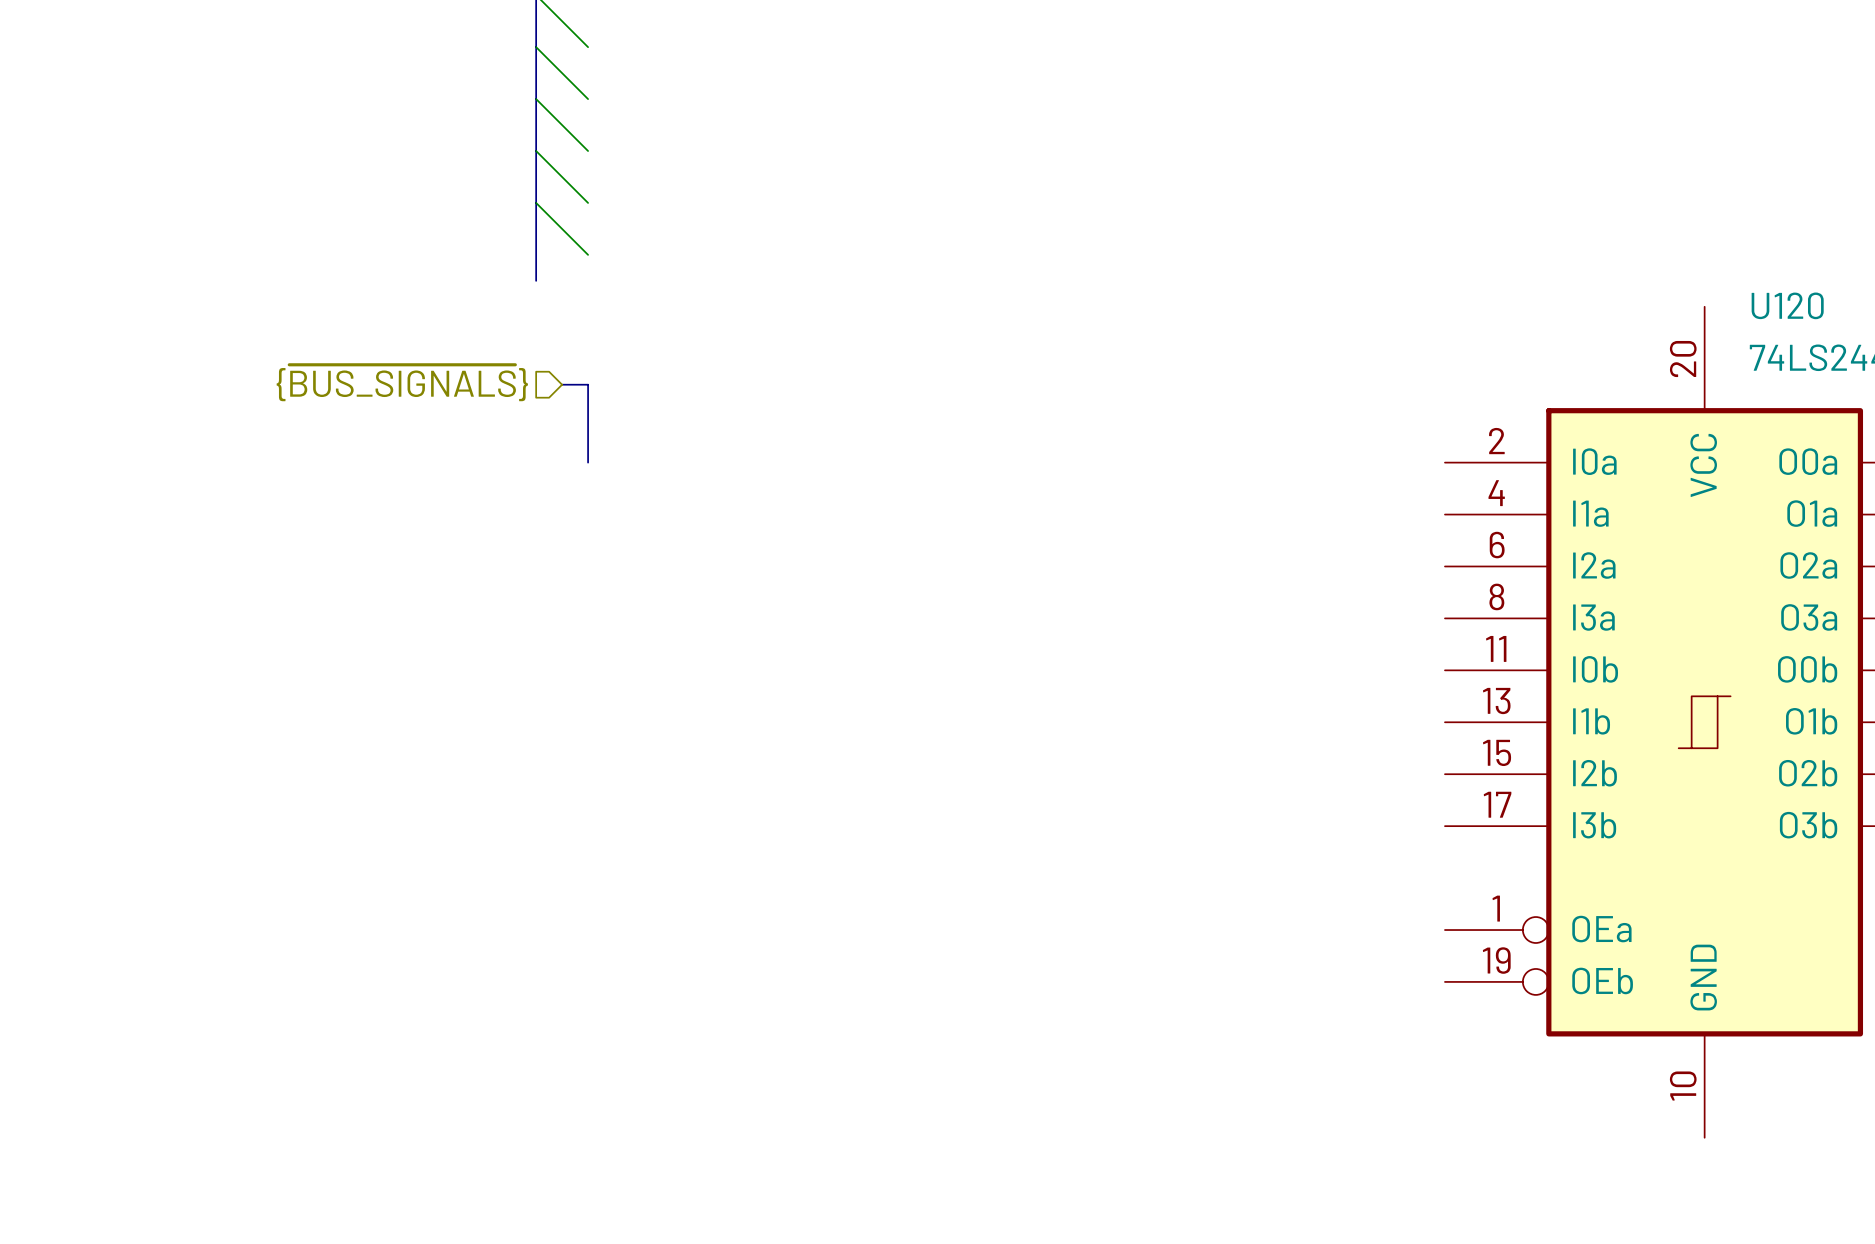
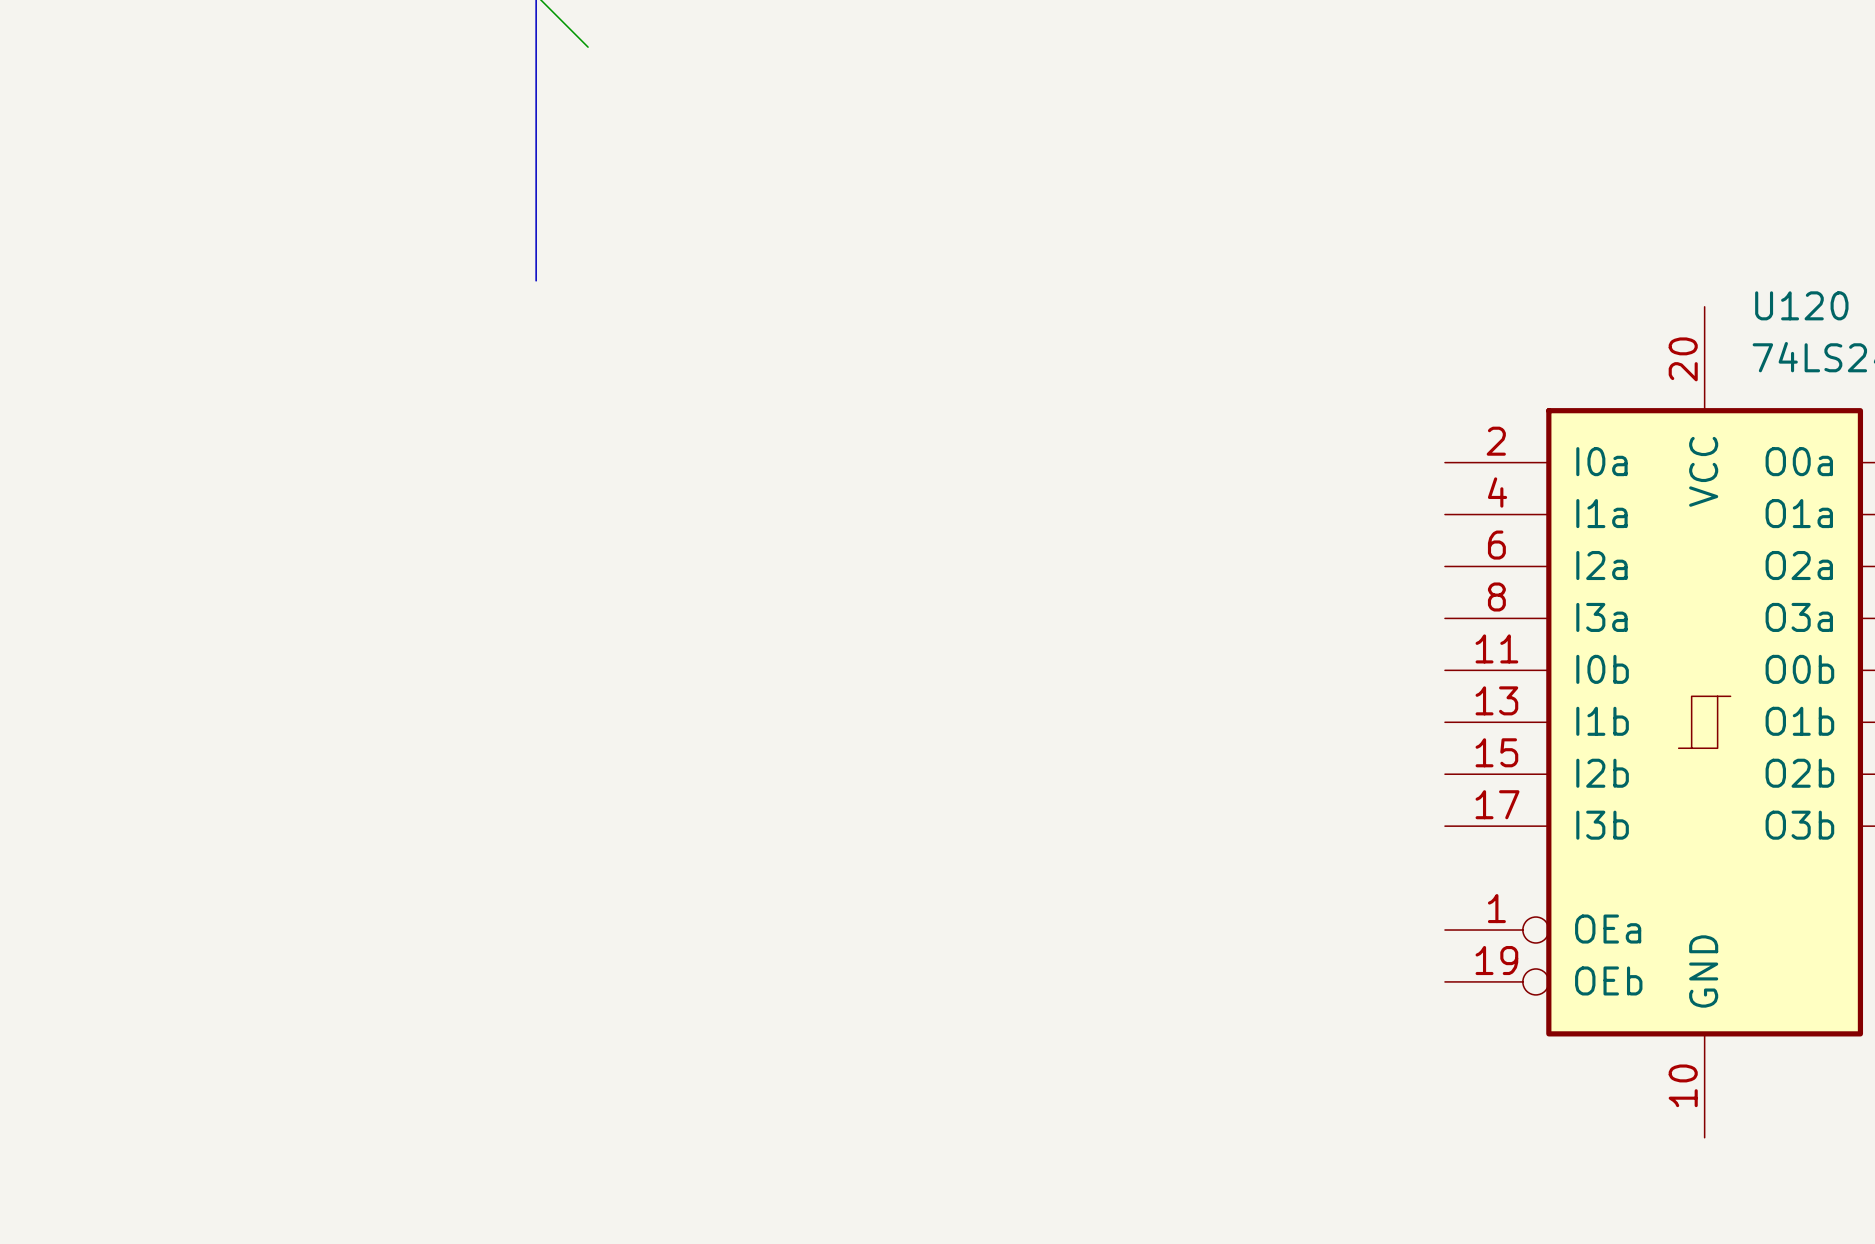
wire: (536, 47) (588, 99) -> none
wire: (536, 99) (588, 151) -> none
wire: (536, 151) (588, 202) -> none
wire: (536, 202) (588, 254) -> none
hierarchical label: {~{BUS_SIGNALS}} (402, 383) -> none
bus: (562, 384) (588, 384) (588, 462) -> none

